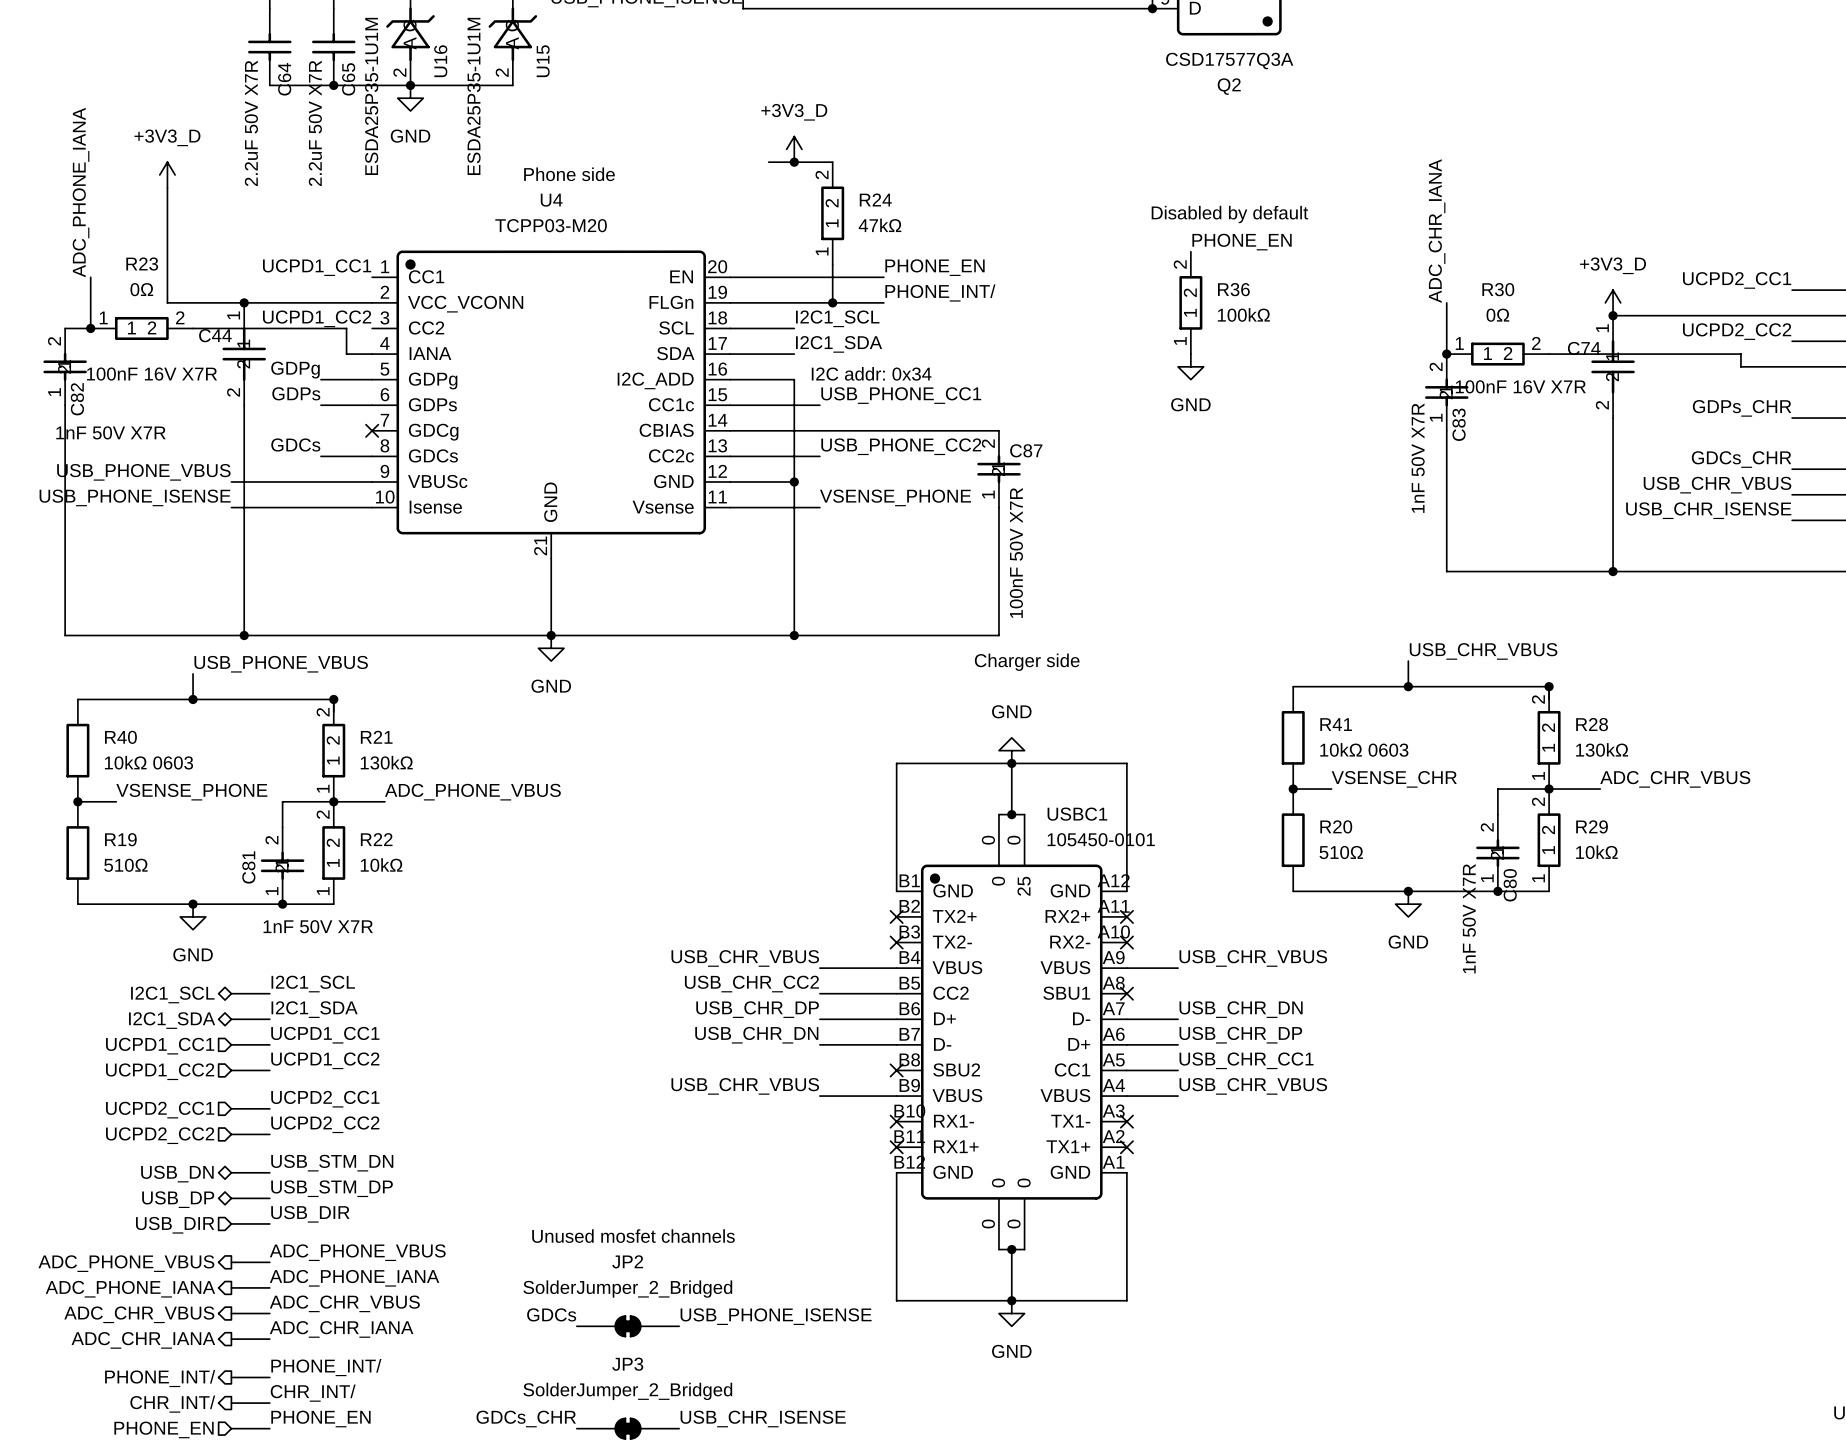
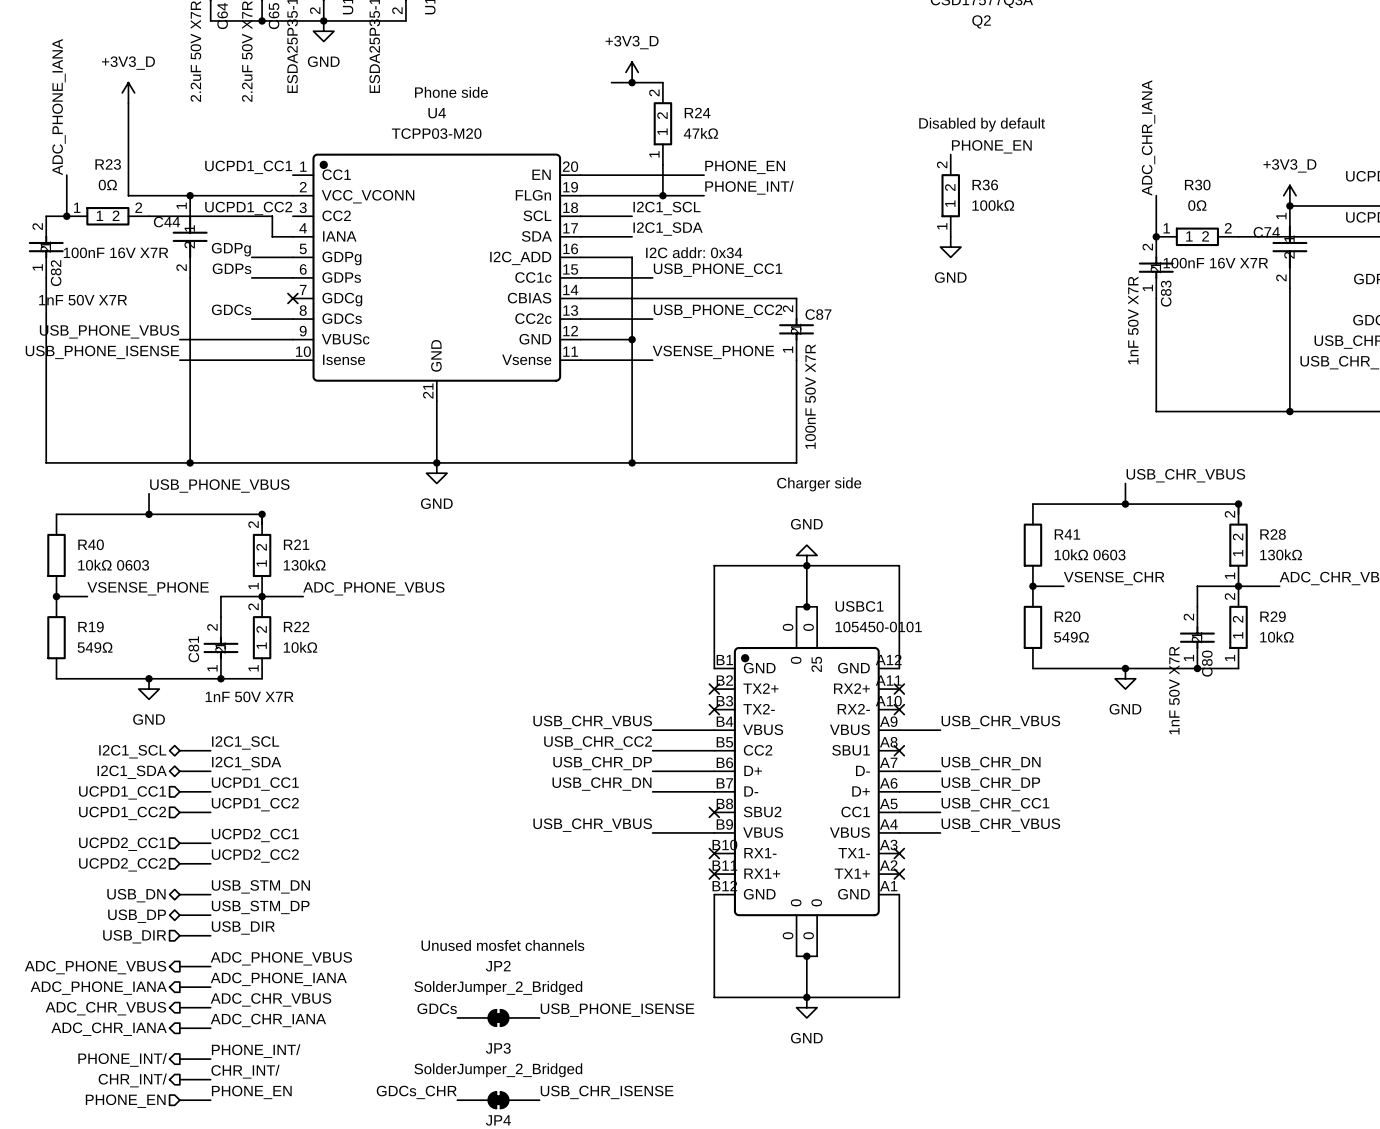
R20 value: 510Ω (1341, 852) -> 549Ω (1071, 637)
R19 value: 510Ω (125, 865) -> 549Ω (95, 647)

